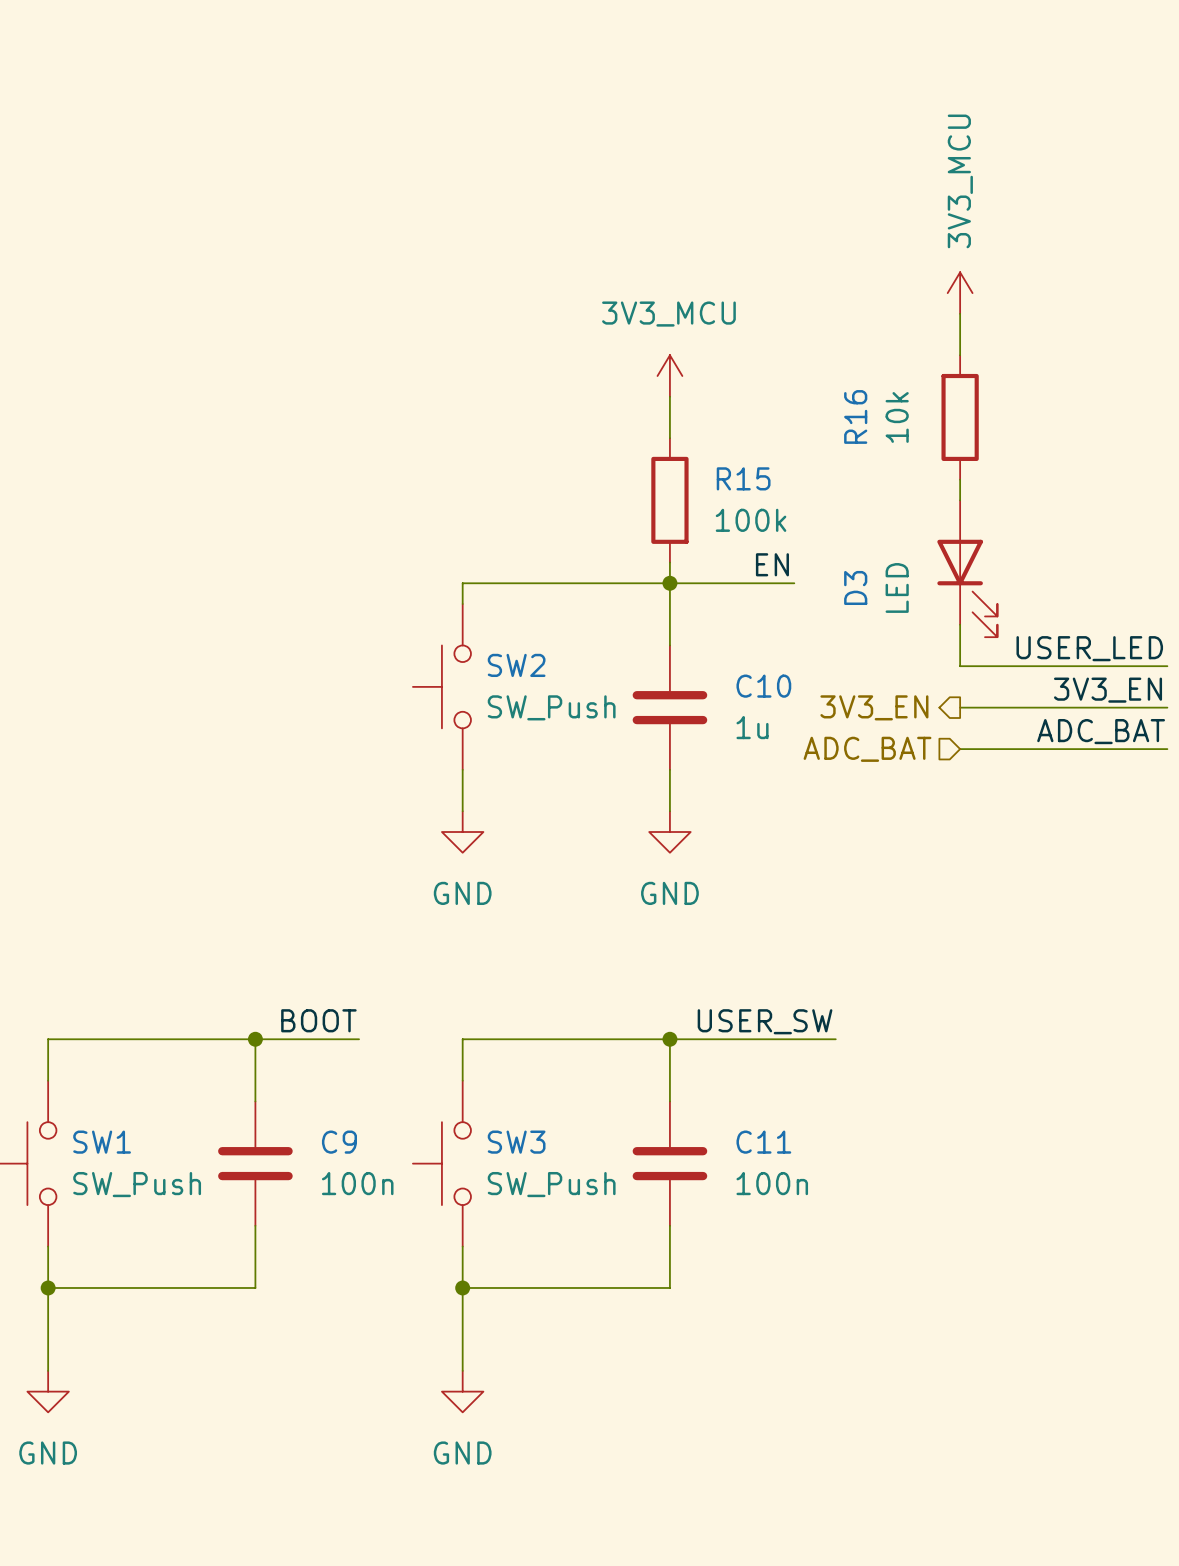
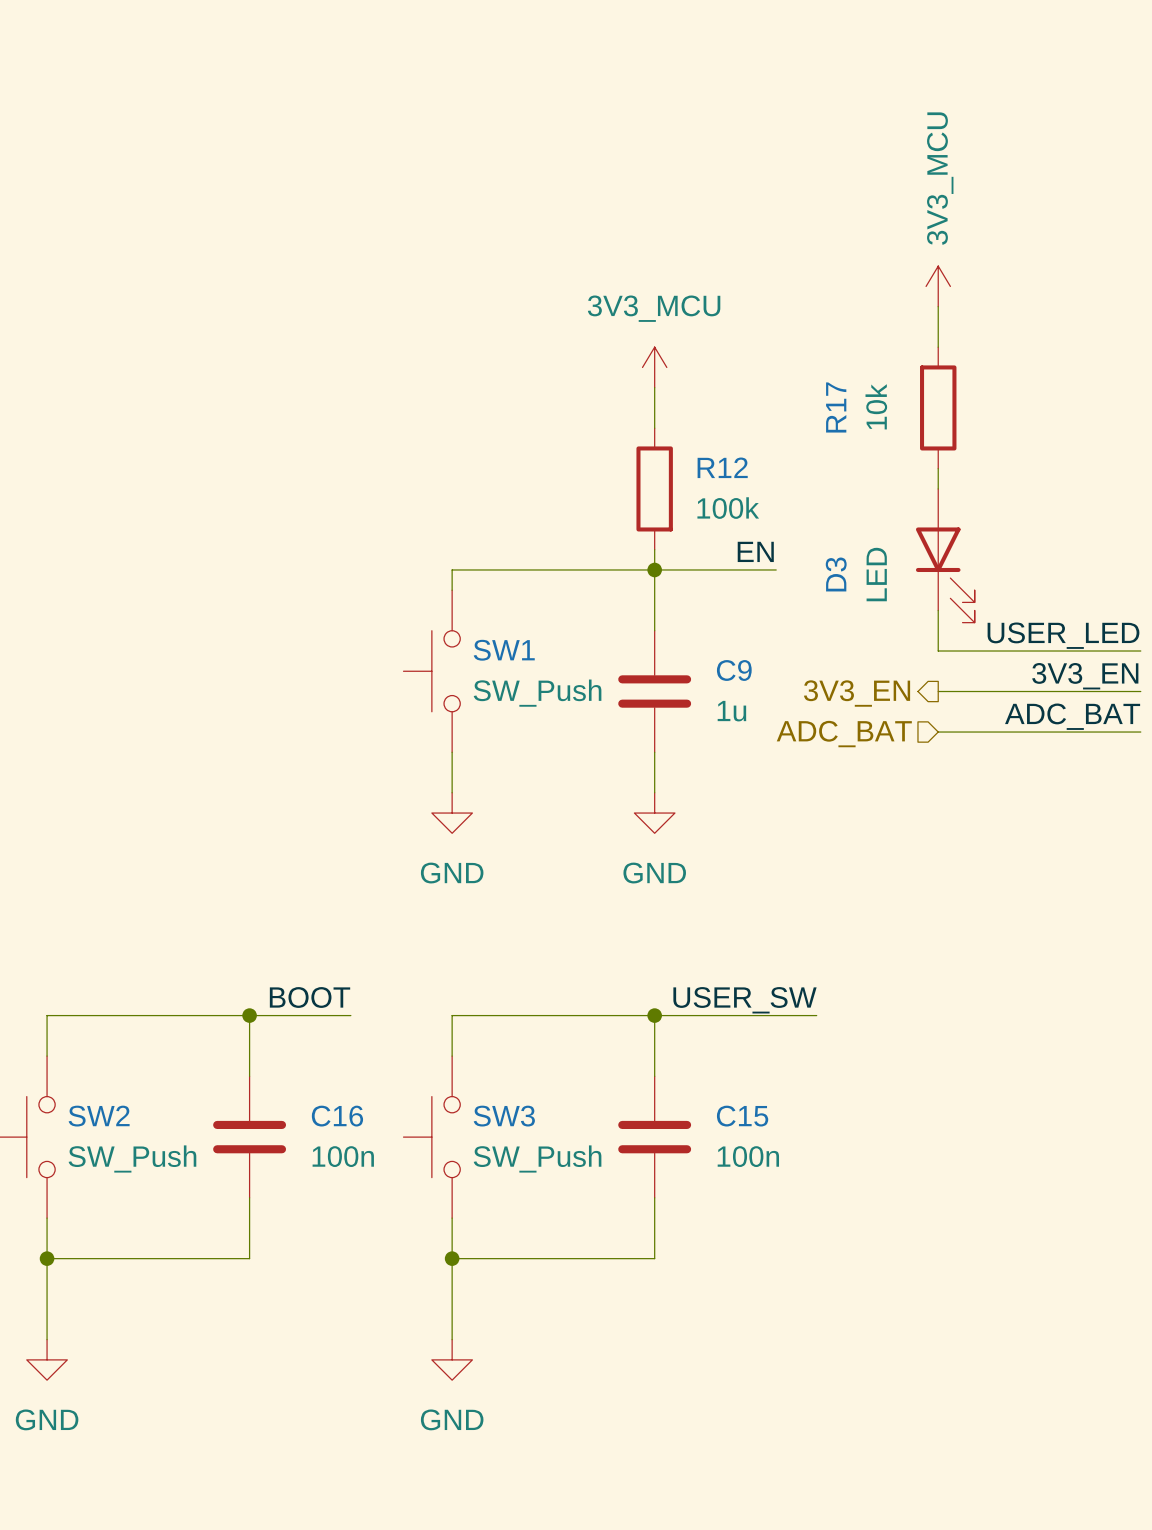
R16 name: R16 (855, 416) -> R17 (836, 407)
R15 name: R15 (743, 478) -> R12 (722, 467)
SW2 name: SW2 (516, 665) -> SW1 (504, 650)
C10 name: C10 (763, 686) -> C9 (734, 670)
SW1 name: SW1 (102, 1142) -> SW2 (99, 1116)
C9 name: C9 (339, 1142) -> C16 (337, 1116)
C11 name: C11 (763, 1142) -> C15 (742, 1116)

